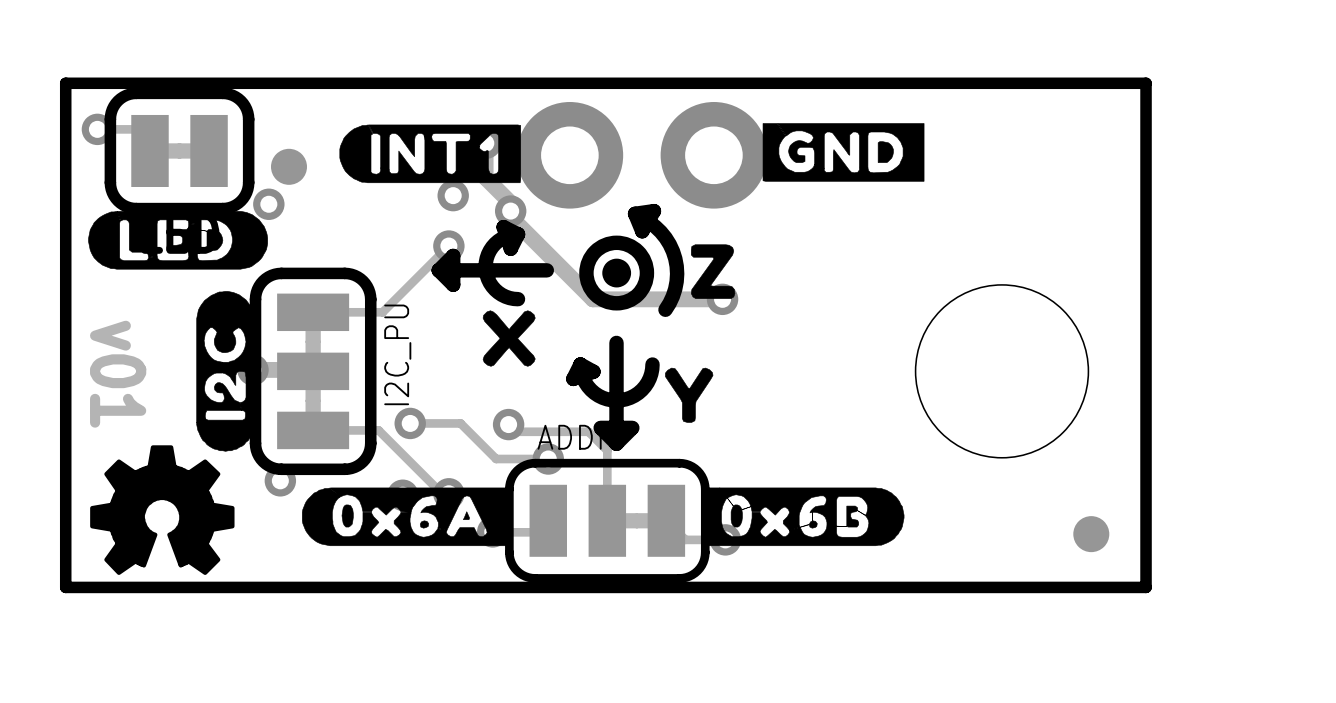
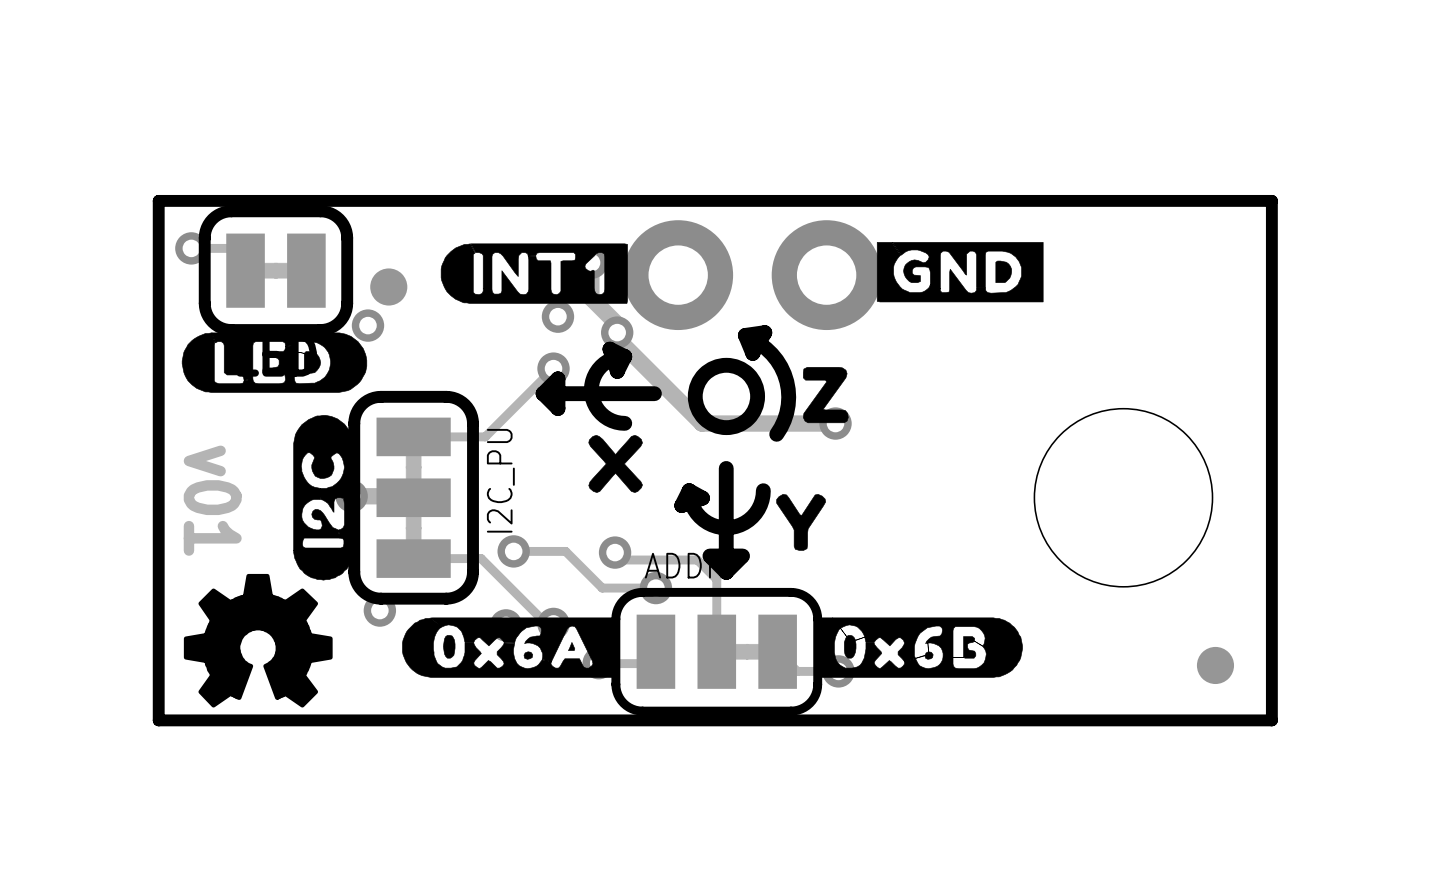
drawing: [602, 258, 632, 288] -> none

